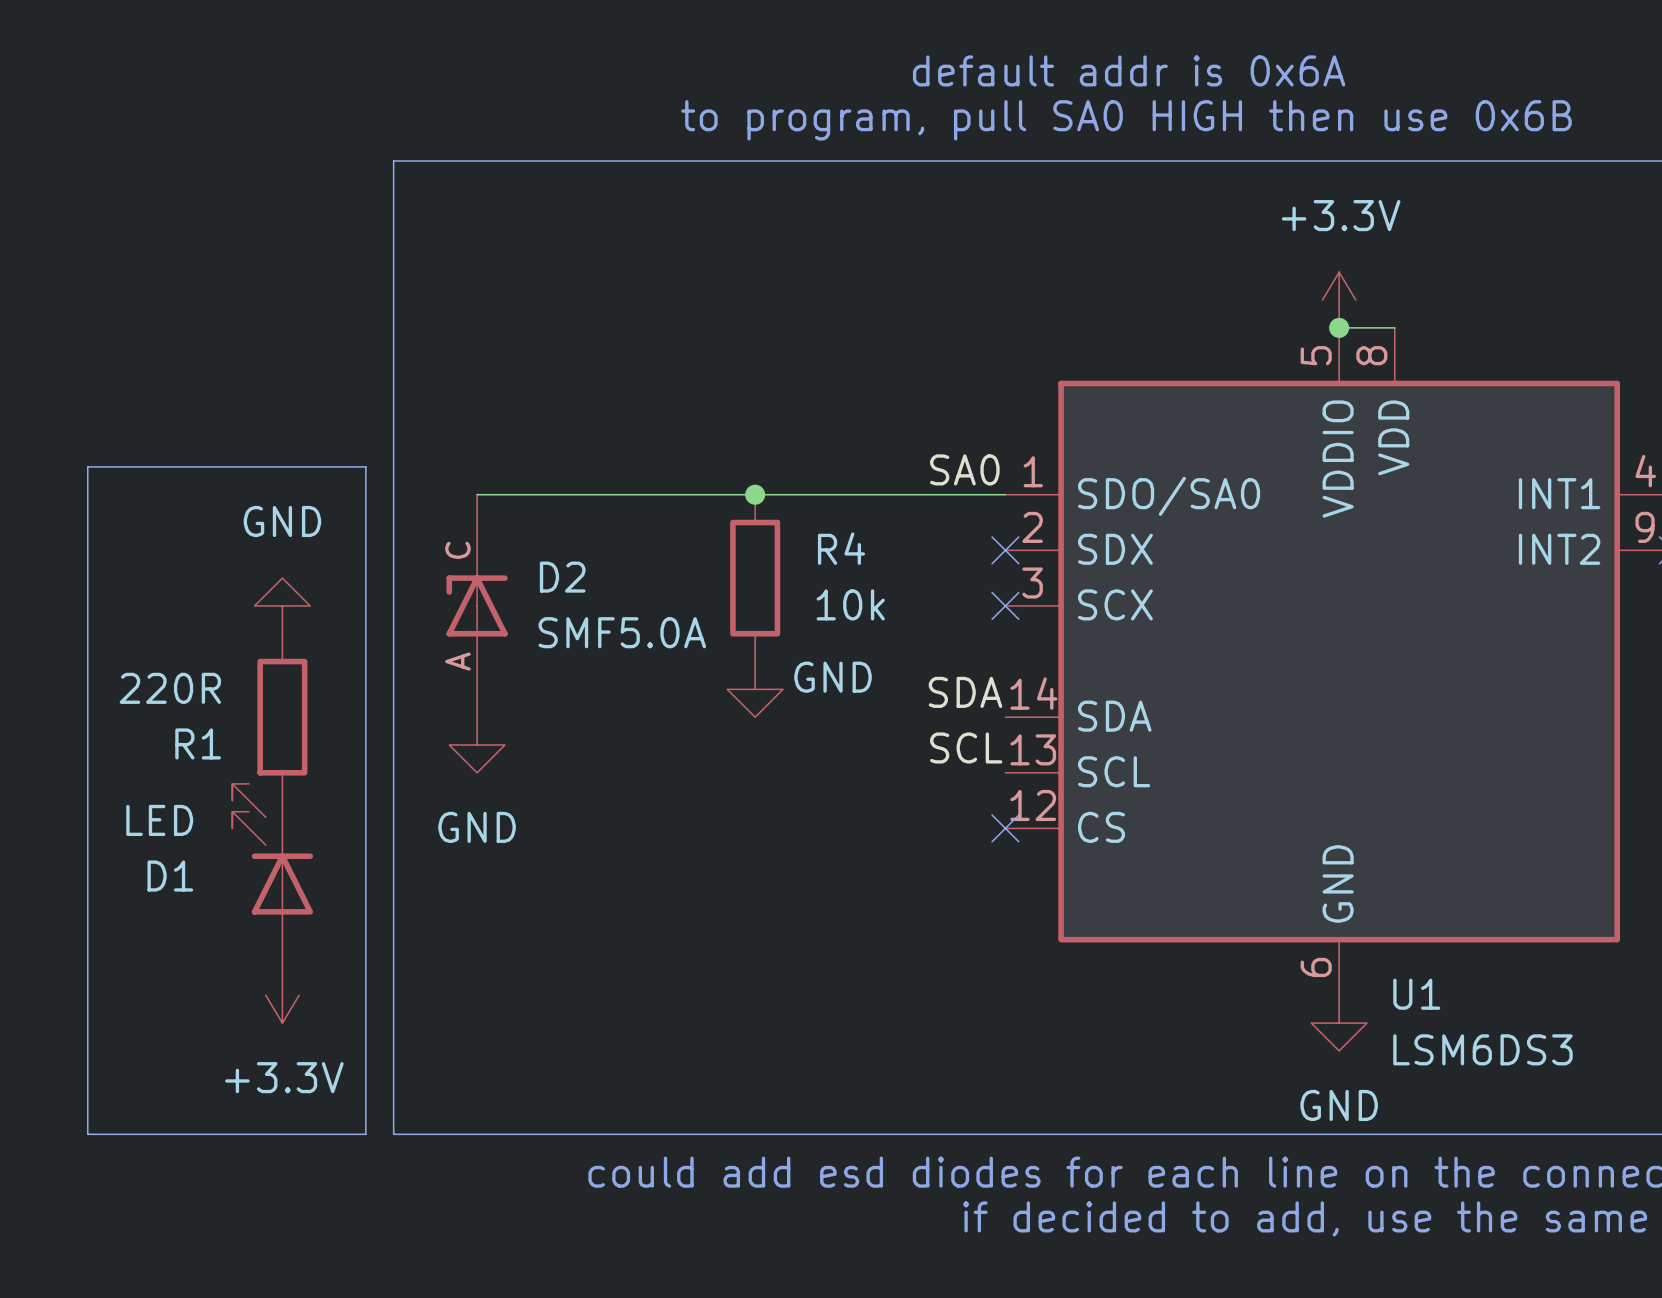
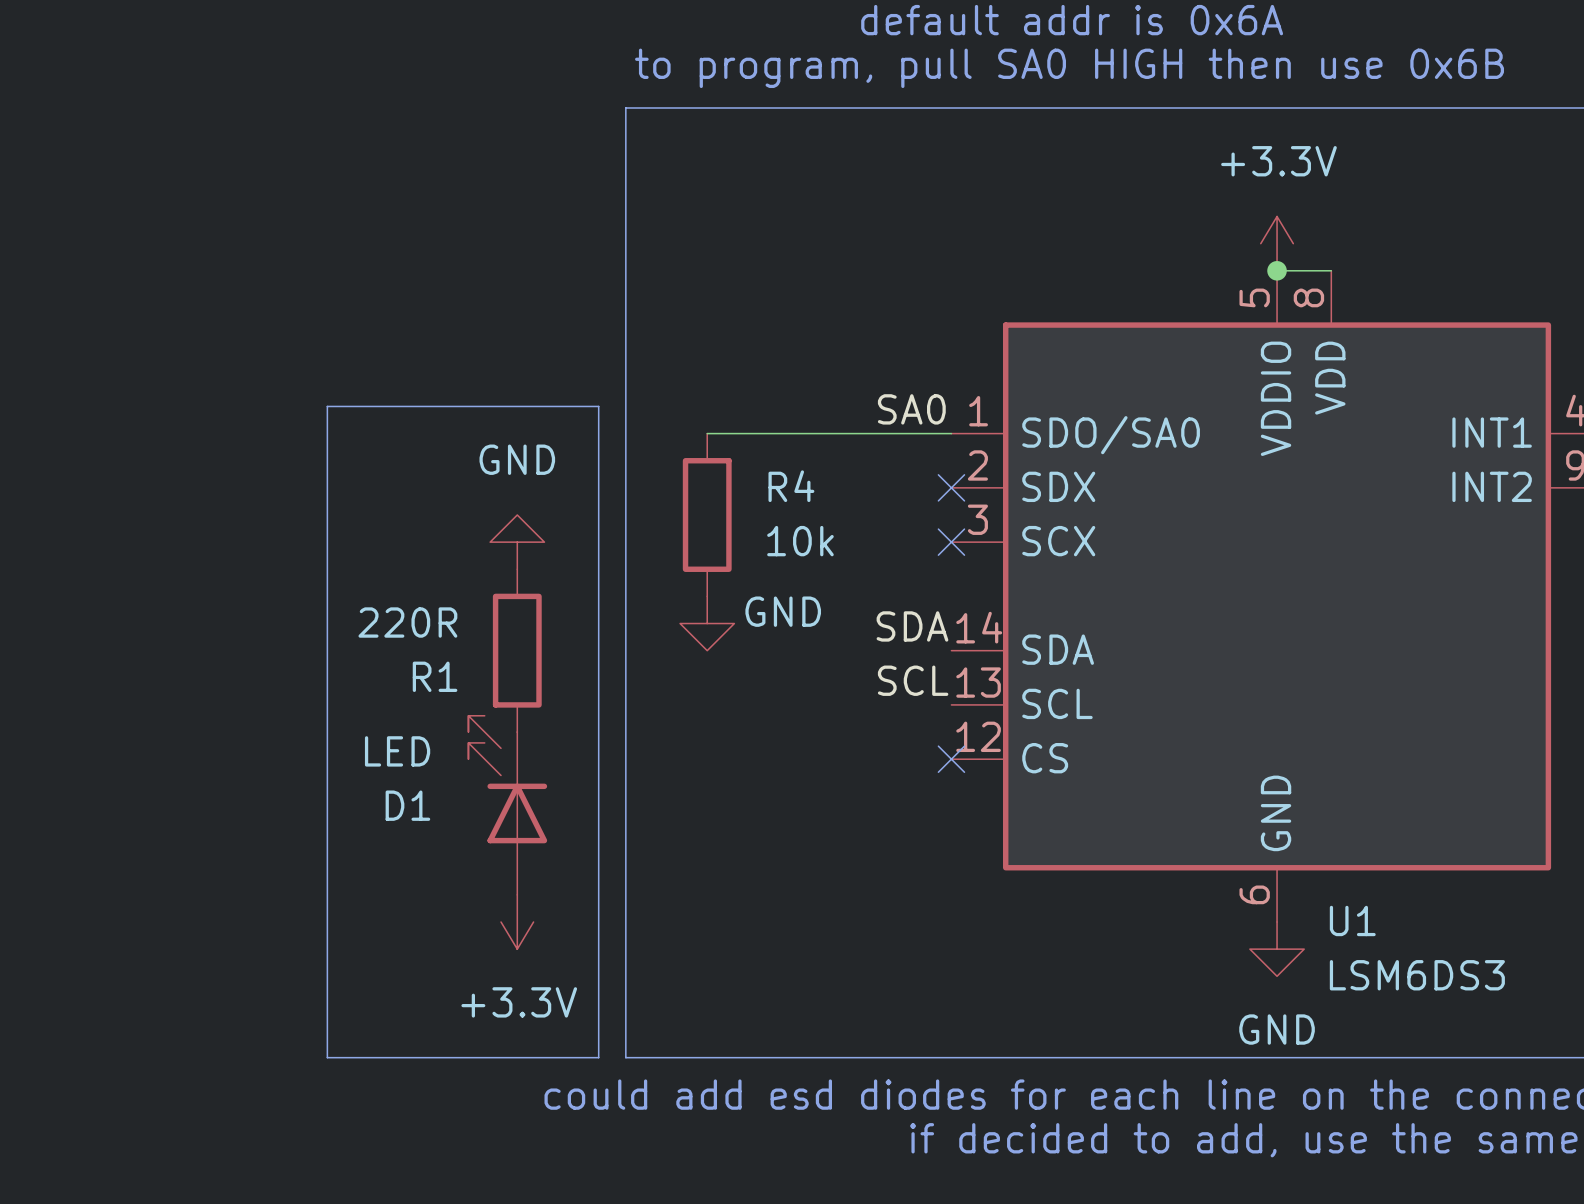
line: (671, 161) (393, 161) (393, 1134) -> (625, 107) (625, 1057)
line: (365, 466) (87, 466) (87, 1134) (365, 1134) -> (327, 406) (598, 406) (598, 1057)
wire: (477, 494) (755, 494) -> none
junction: (755, 494) -> none
power symbol: GND (282, 605) -> none
D2: SMF5.0A (477, 605) -> none
power symbol: none -> GND (517, 542)
R1 position: (282, 717) -> (517, 650)
power symbol: GND (477, 744) -> none
D1 position: (272, 875) -> (507, 805)
power symbol position: +3.3V (282, 995) -> +3.3V (517, 922)
line: (643, 1134) (671, 1134) -> (327, 1057) (354, 1057)

